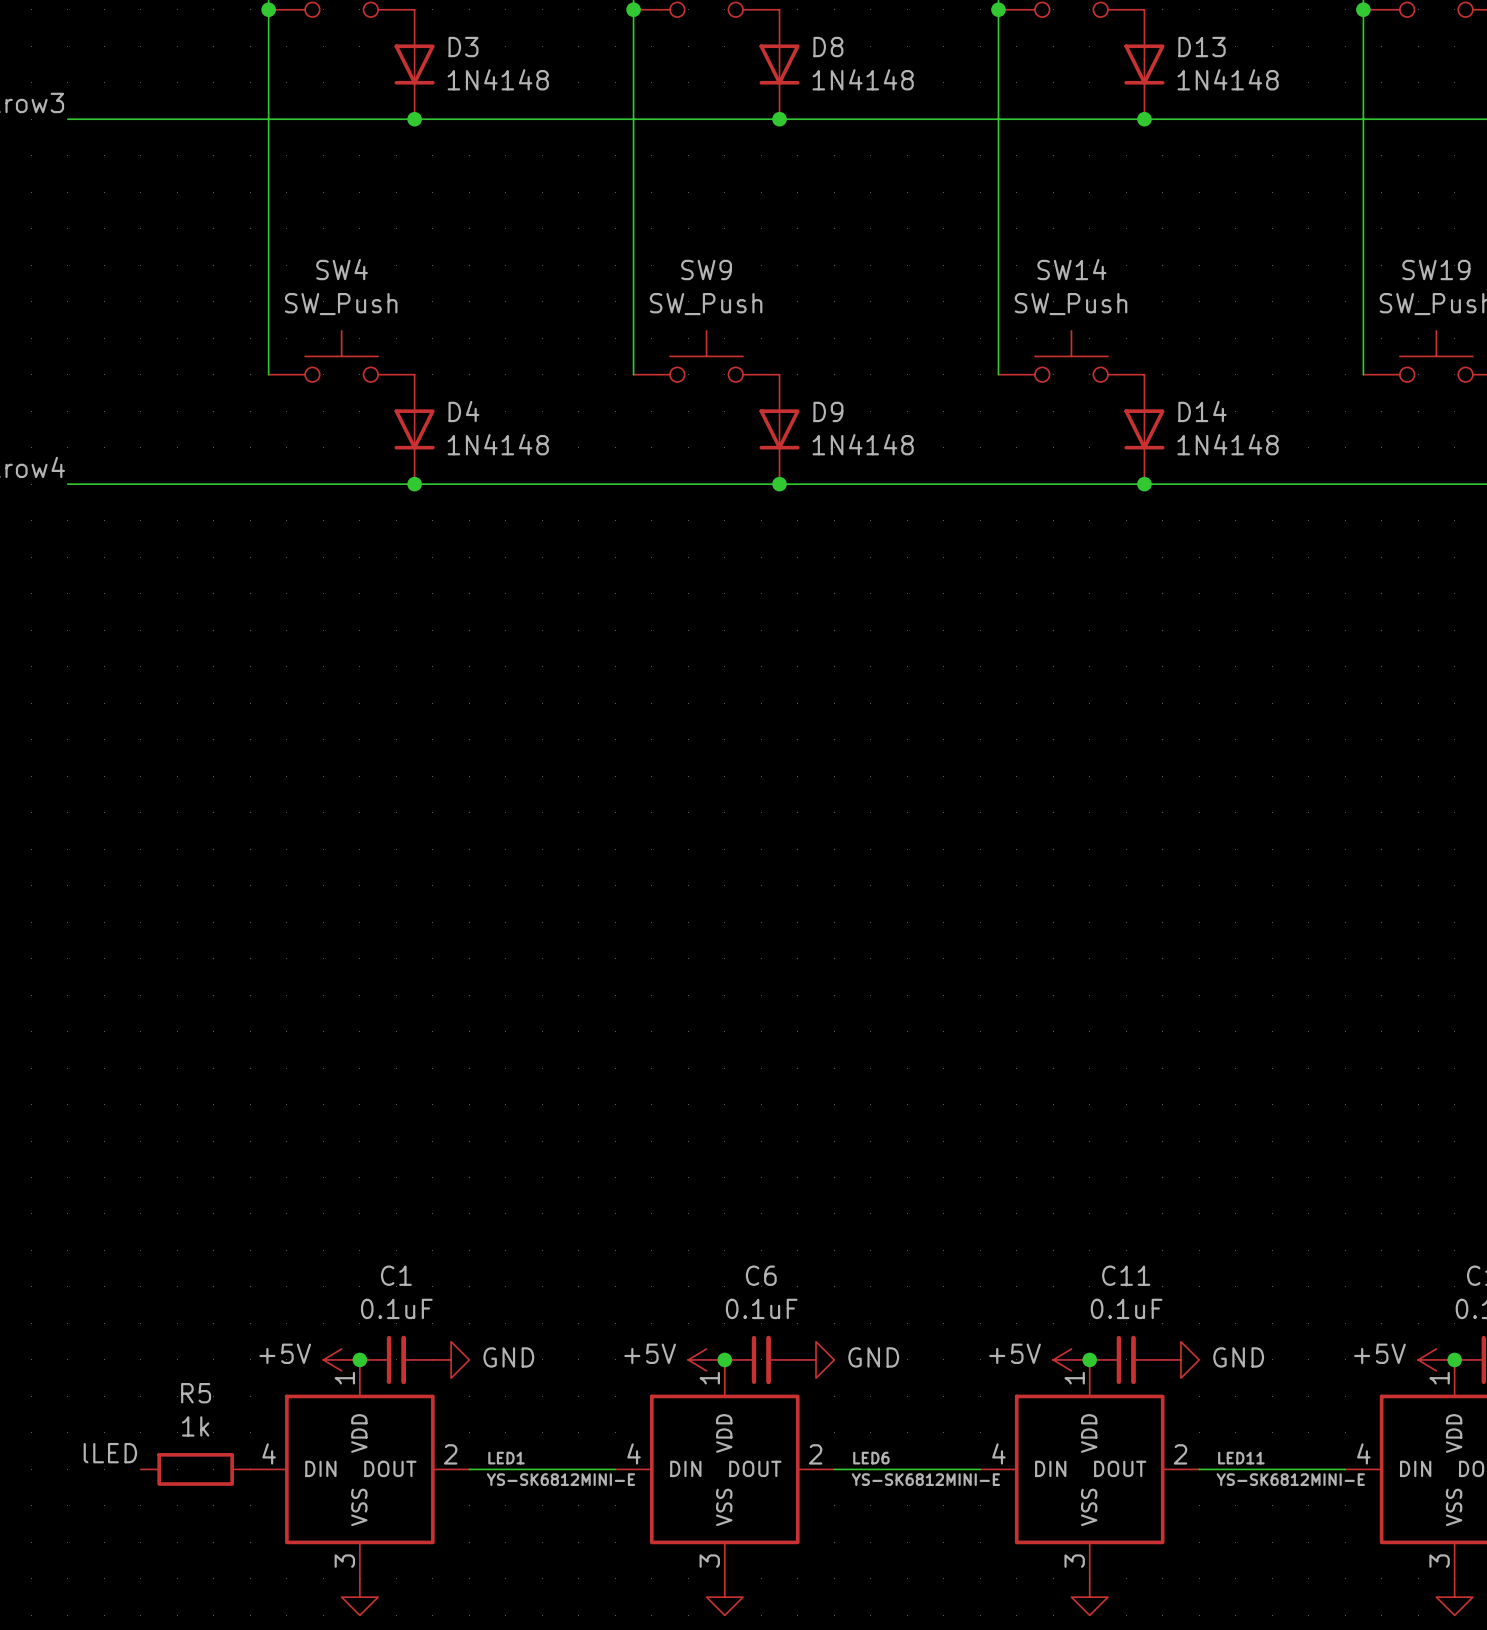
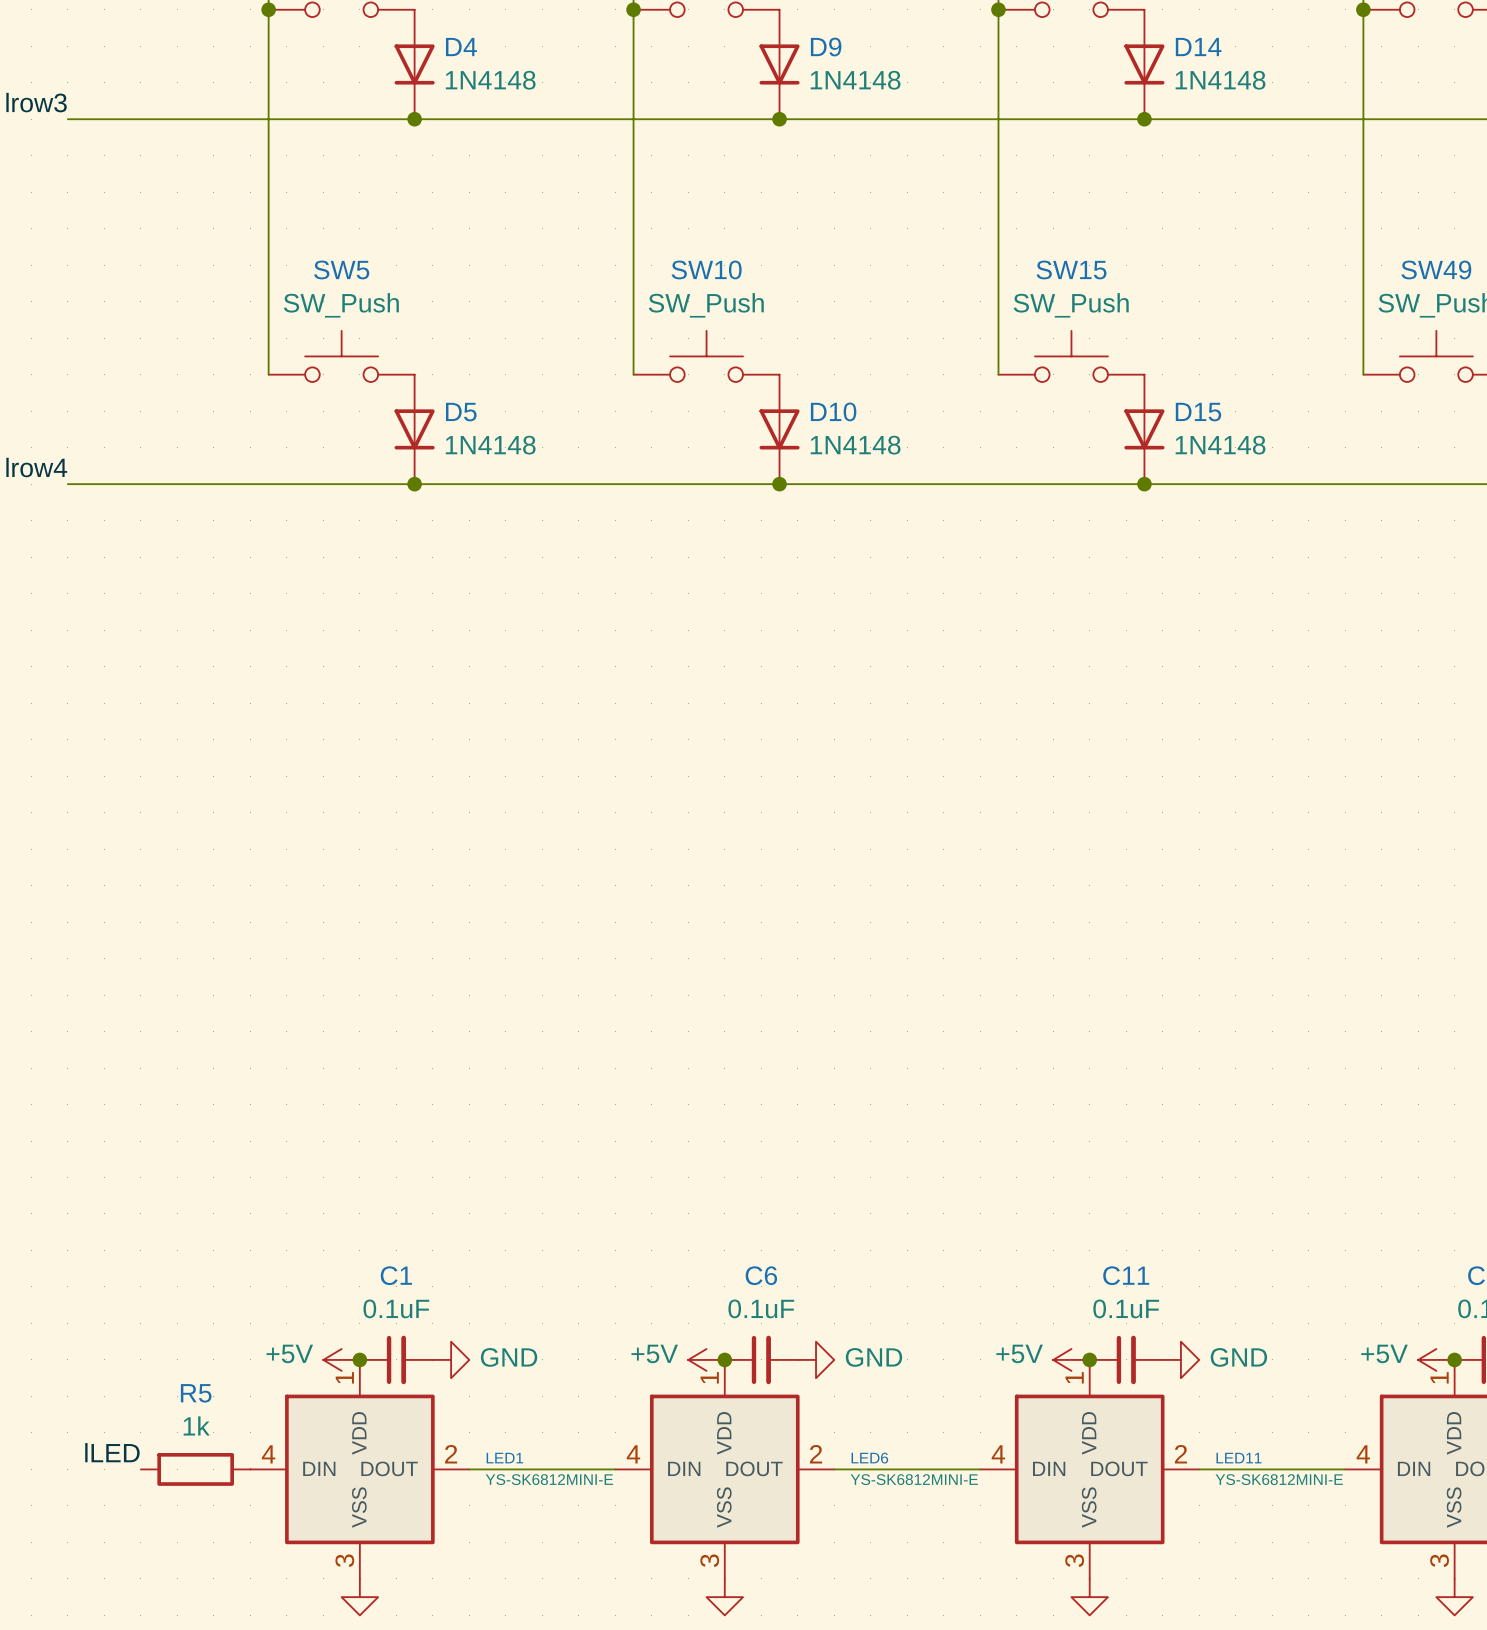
D3 name: D3 (463, 47) -> D4 (461, 47)
D8 name: D8 (828, 47) -> D9 (826, 47)
D13 name: D13 (1202, 47) -> D14 (1198, 47)
SW4 name: SW4 (342, 269) -> SW5 (341, 269)
SW9 name: SW9 (706, 269) -> SW10 (706, 269)
SW14 name: SW14 (1071, 269) -> SW15 (1071, 269)
SW19 name: SW19 (1436, 269) -> SW49 (1436, 269)
D4 name: D4 (463, 411) -> D5 (461, 412)
D9 name: D9 (828, 411) -> D10 (833, 411)
D14 name: D14 (1202, 411) -> D15 (1198, 412)

